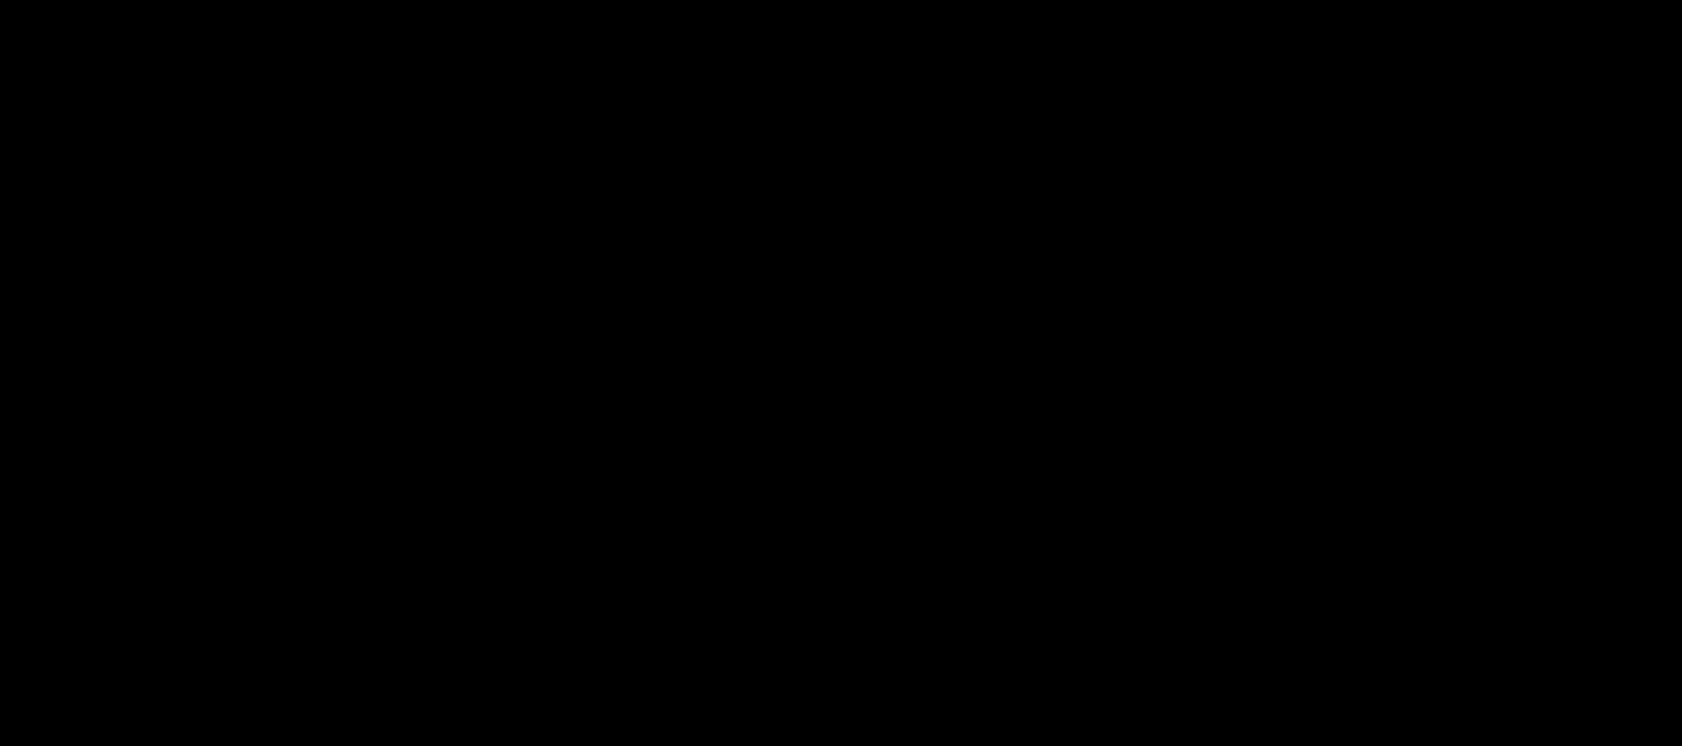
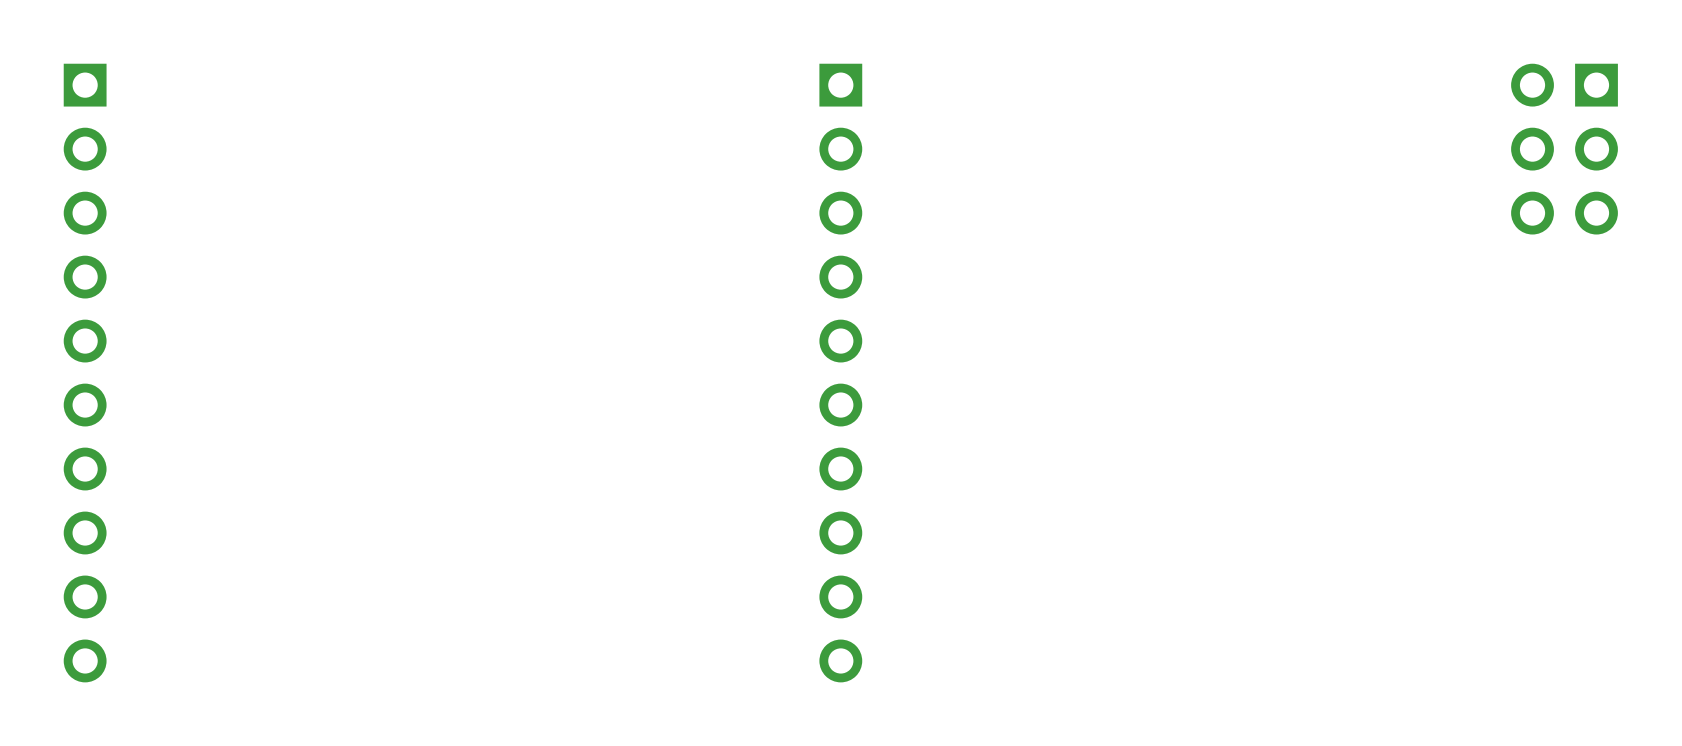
part: none -> (1564, 149)
part: none -> (85, 373)
part: none -> (840, 373)

